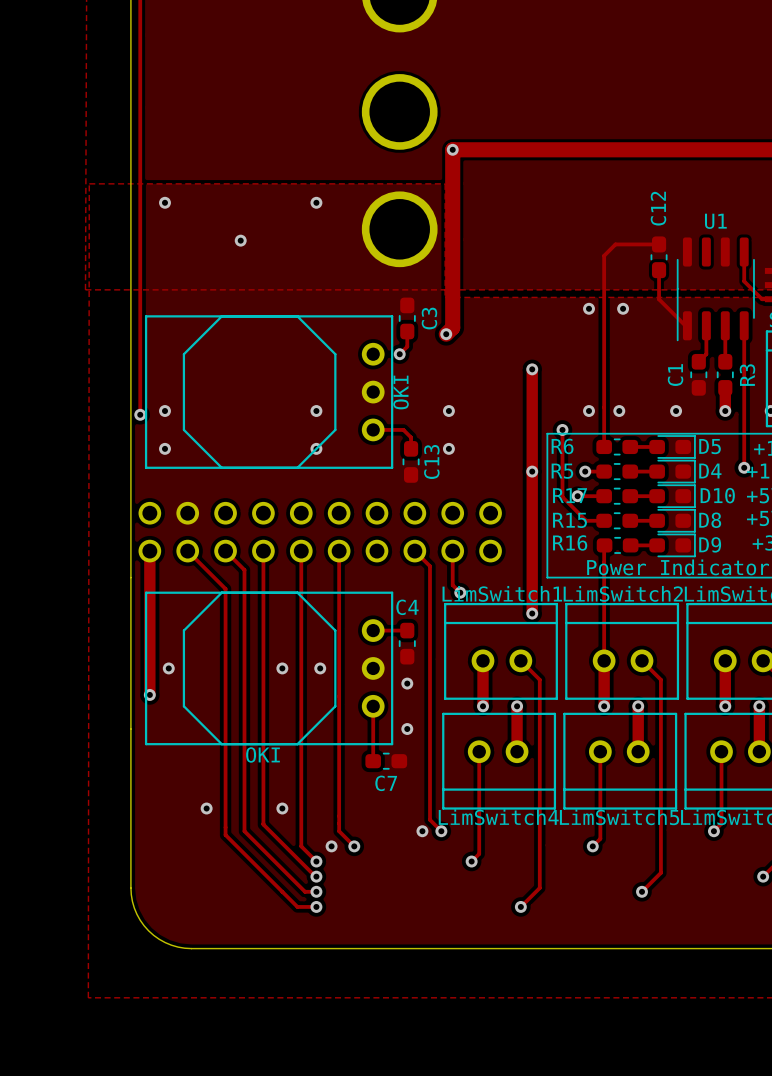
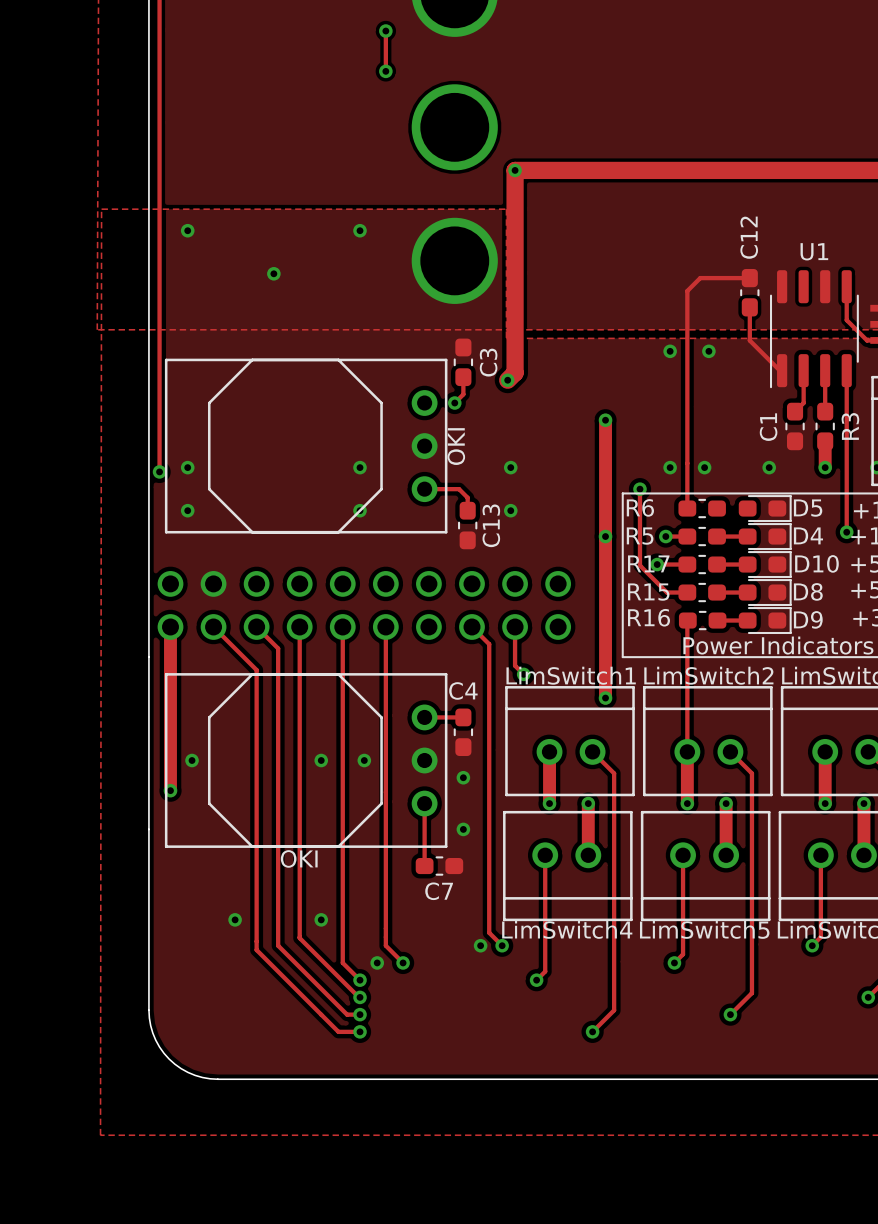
track: none -> (385, 31) (385, 71)
via: none -> (385, 31)
via: none -> (385, 71)
track: (630, 446) (657, 446) -> none

